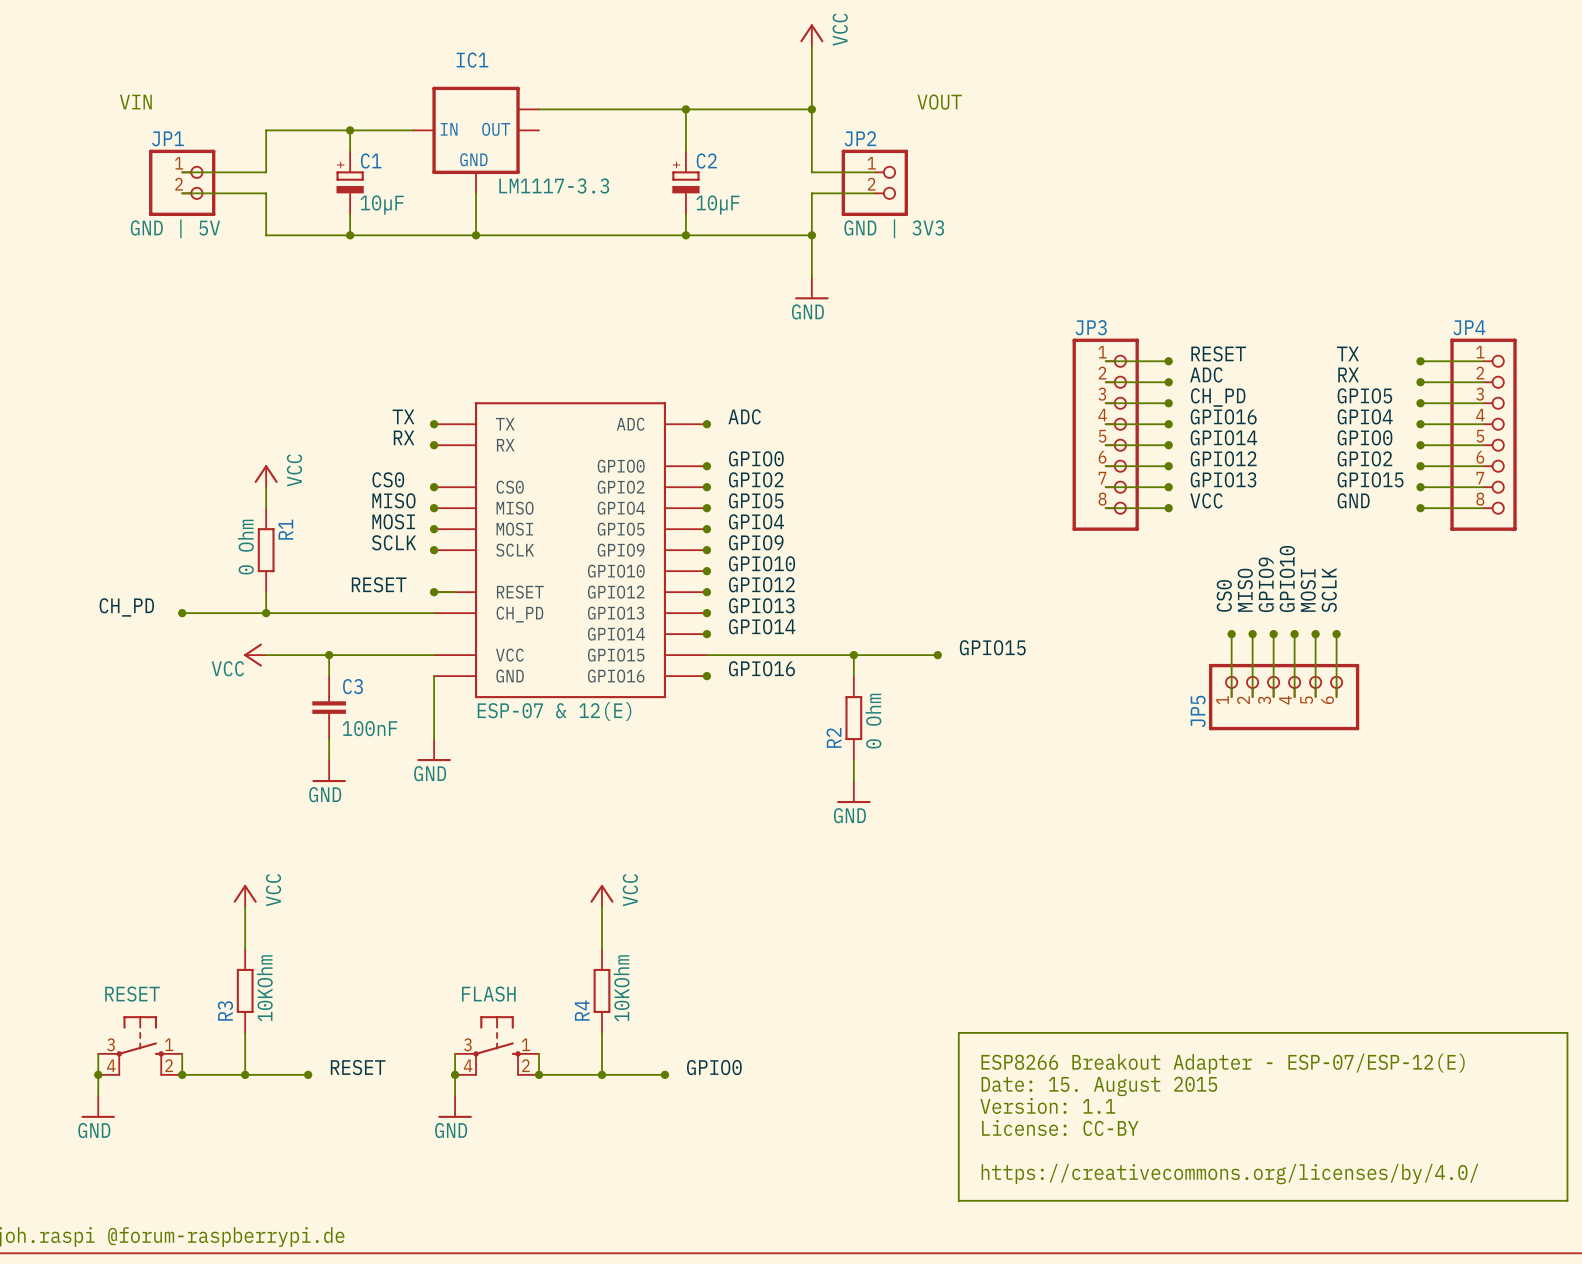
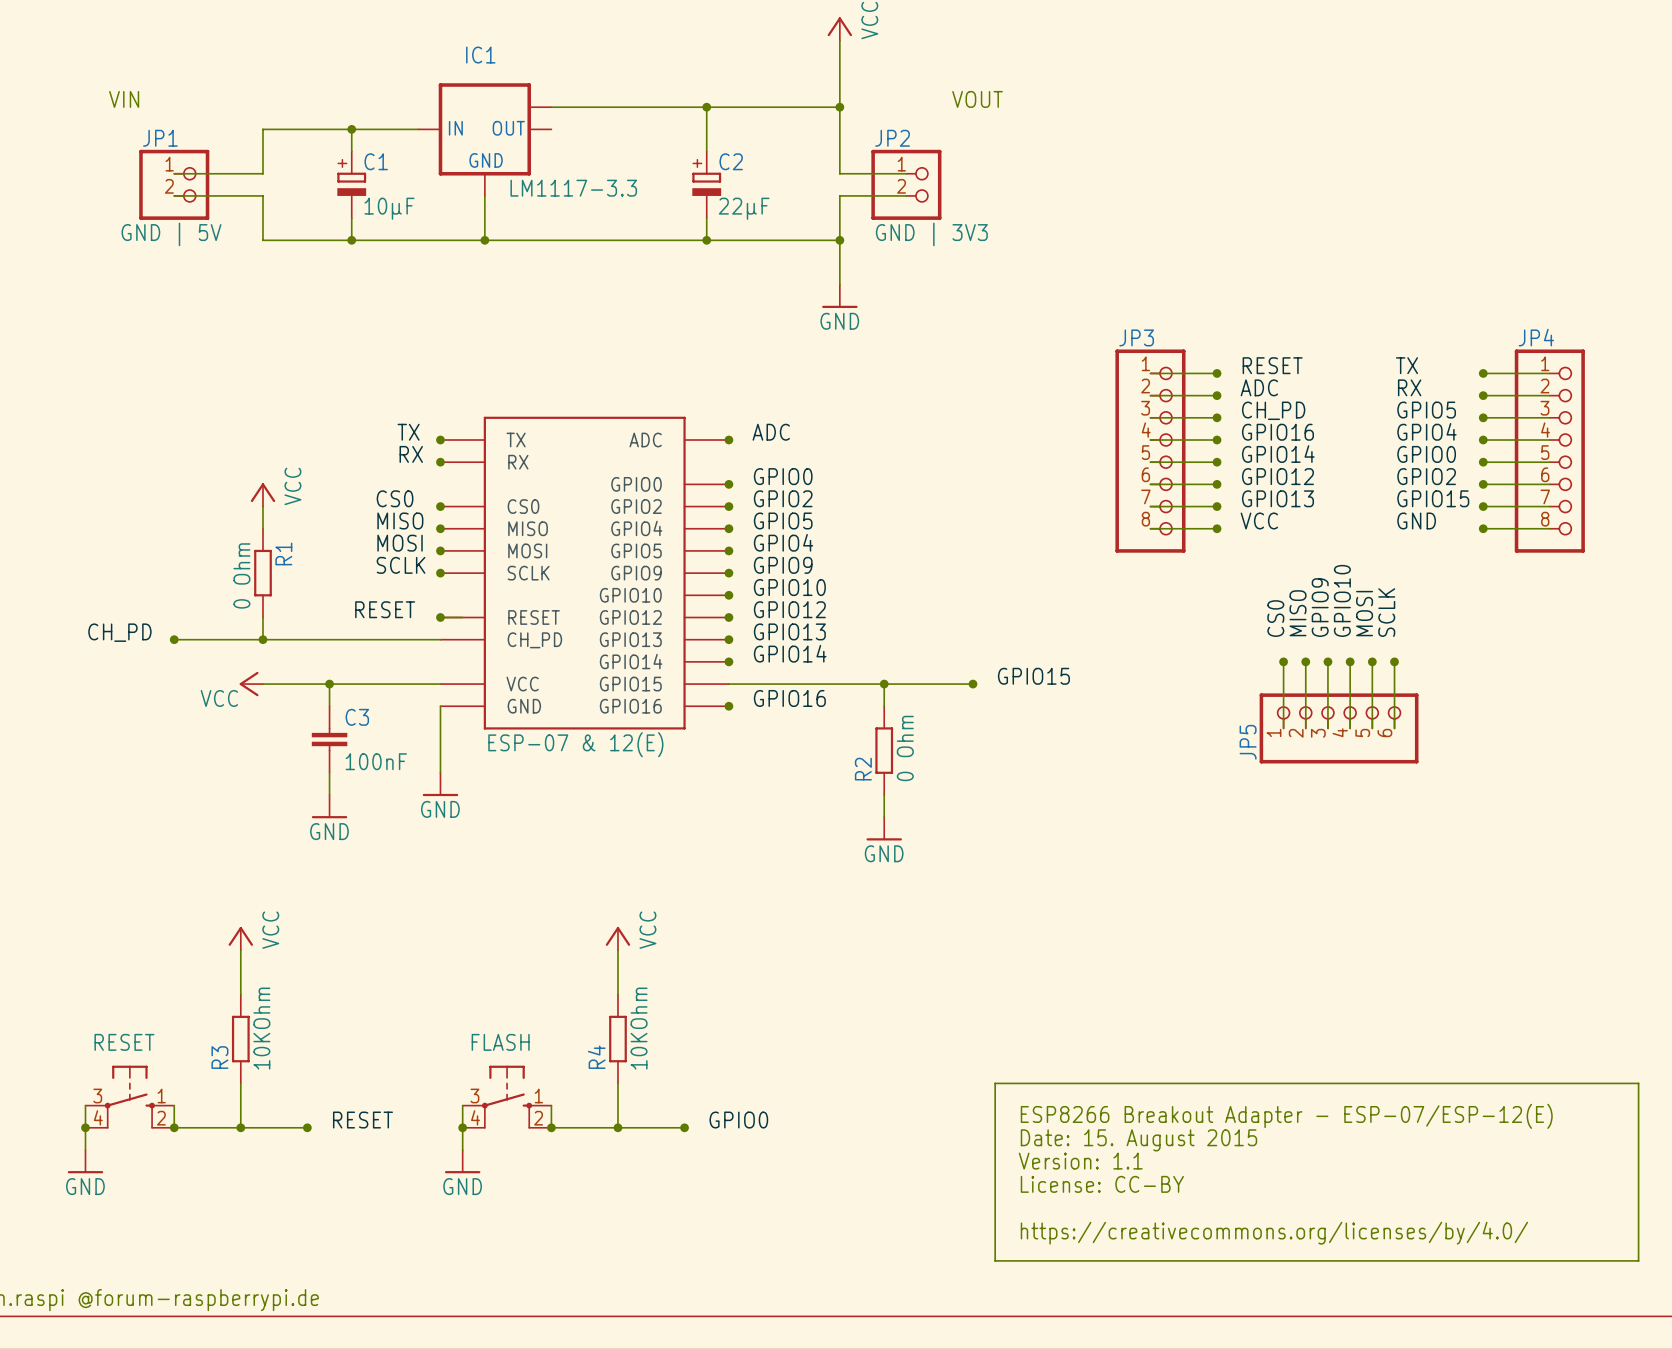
C2 value: 10µF (717, 204) -> 22µF (744, 208)

